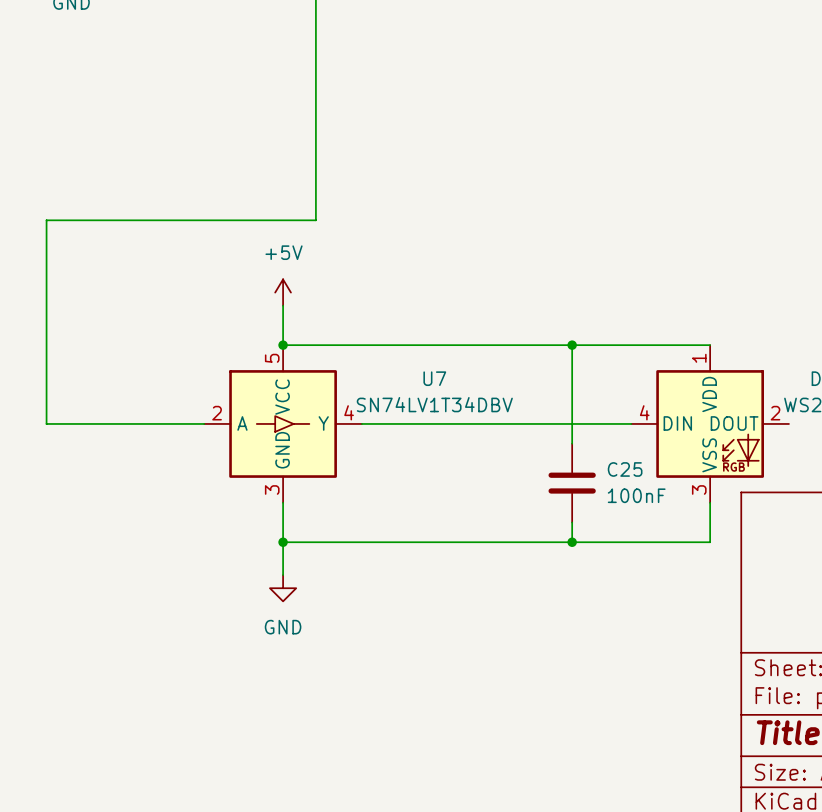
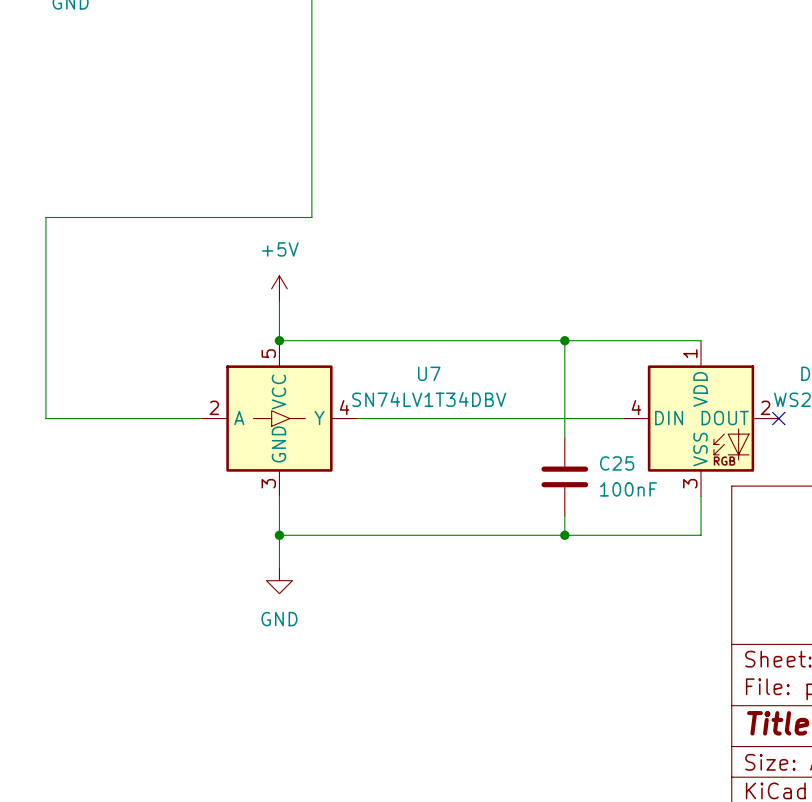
no-connect mark: none -> (778, 418)

